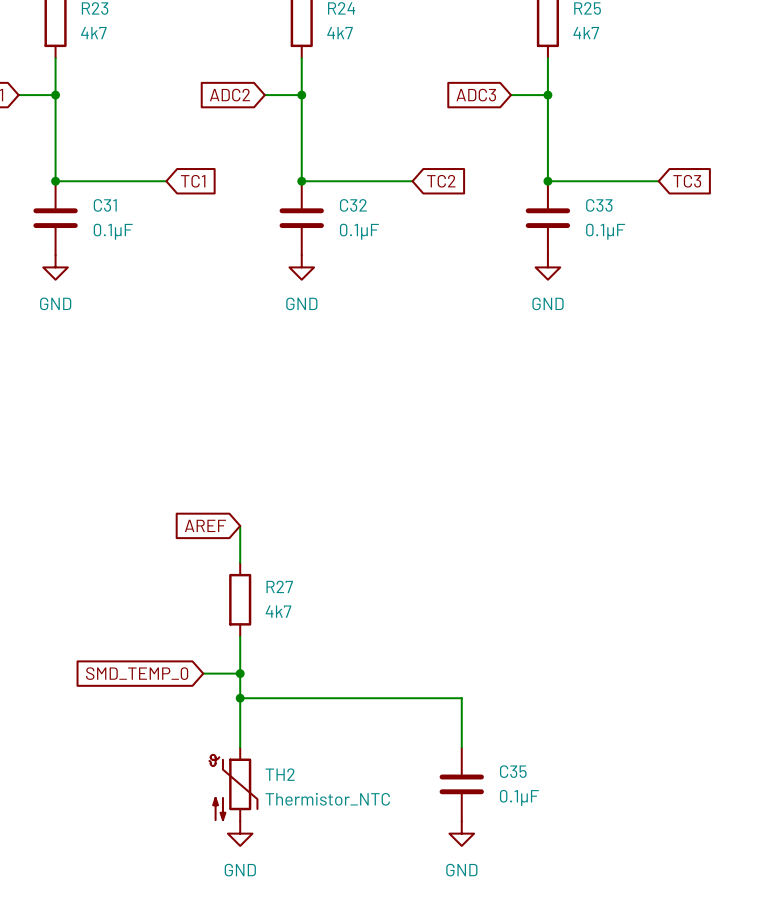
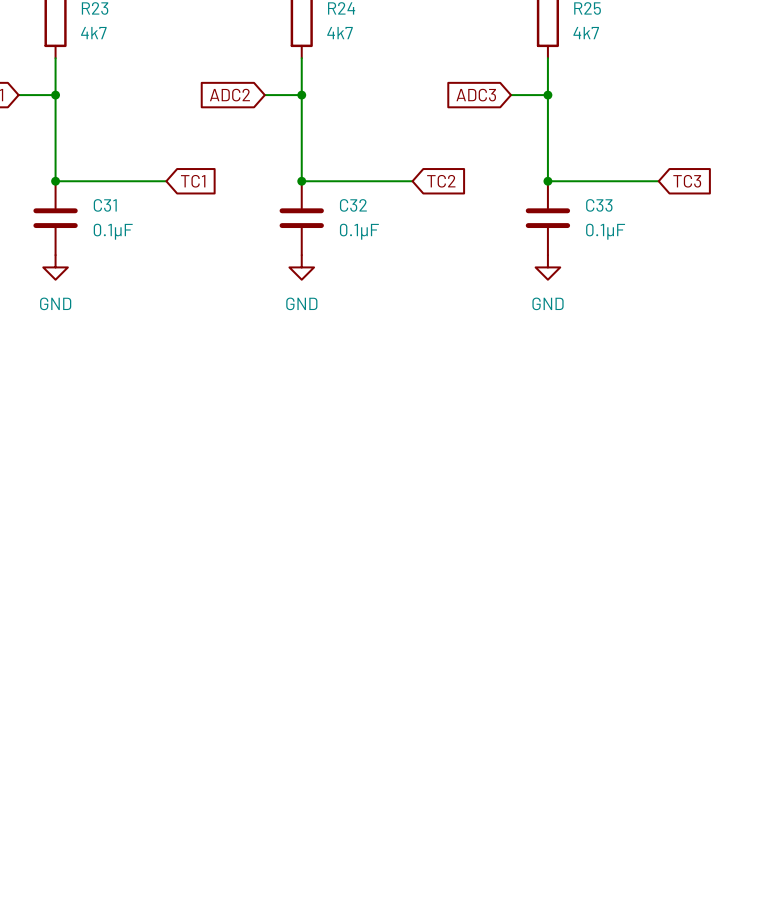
global label: AREF (205, 525) -> none
wire: (240, 525) (240, 562) -> none
R27: 4k7 (240, 599) -> none
wire: (240, 636) (240, 747) -> none
global label: SMD_TEMP_0 (137, 673) -> none
wire: (203, 673) (240, 673) -> none
junction: (240, 673) -> none
wire: (240, 698) (461, 698) (461, 747) -> none
junction: (240, 698) -> none
TH2: Thermistor_NTC (233, 784) -> none
C35: 0.1µF (461, 784) -> none
power symbol: GND (240, 833) -> none
power symbol: GND (461, 833) -> none

